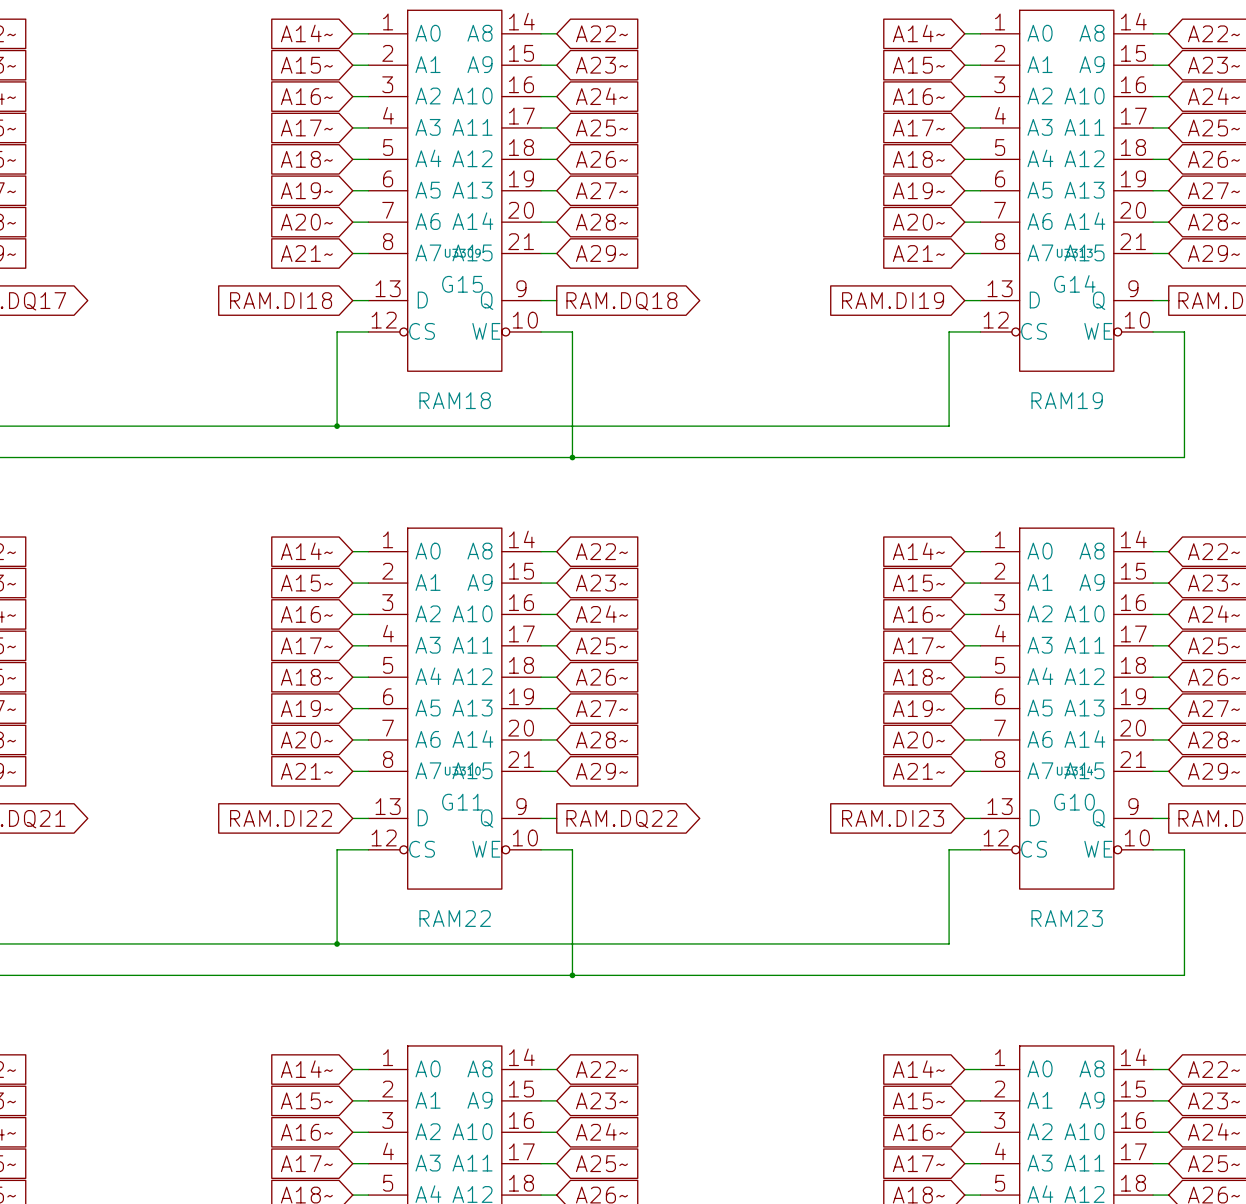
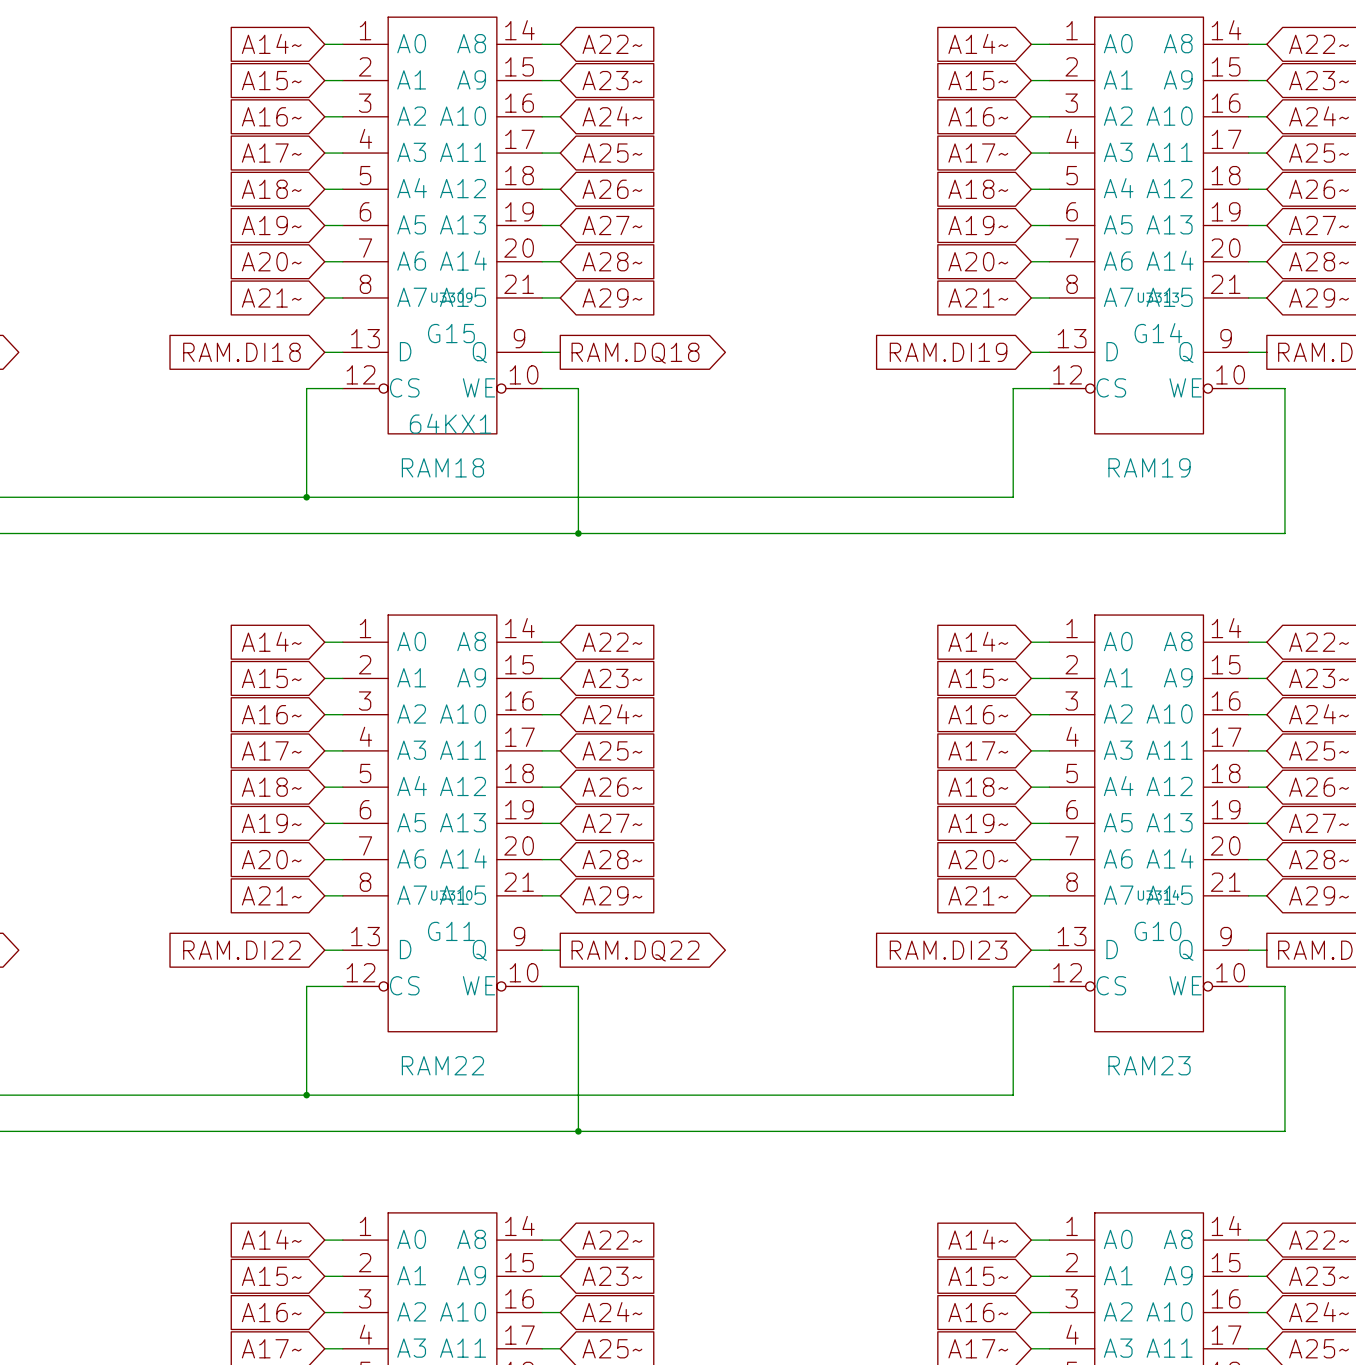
U3309 value: none -> 64KX1 (450, 423)

